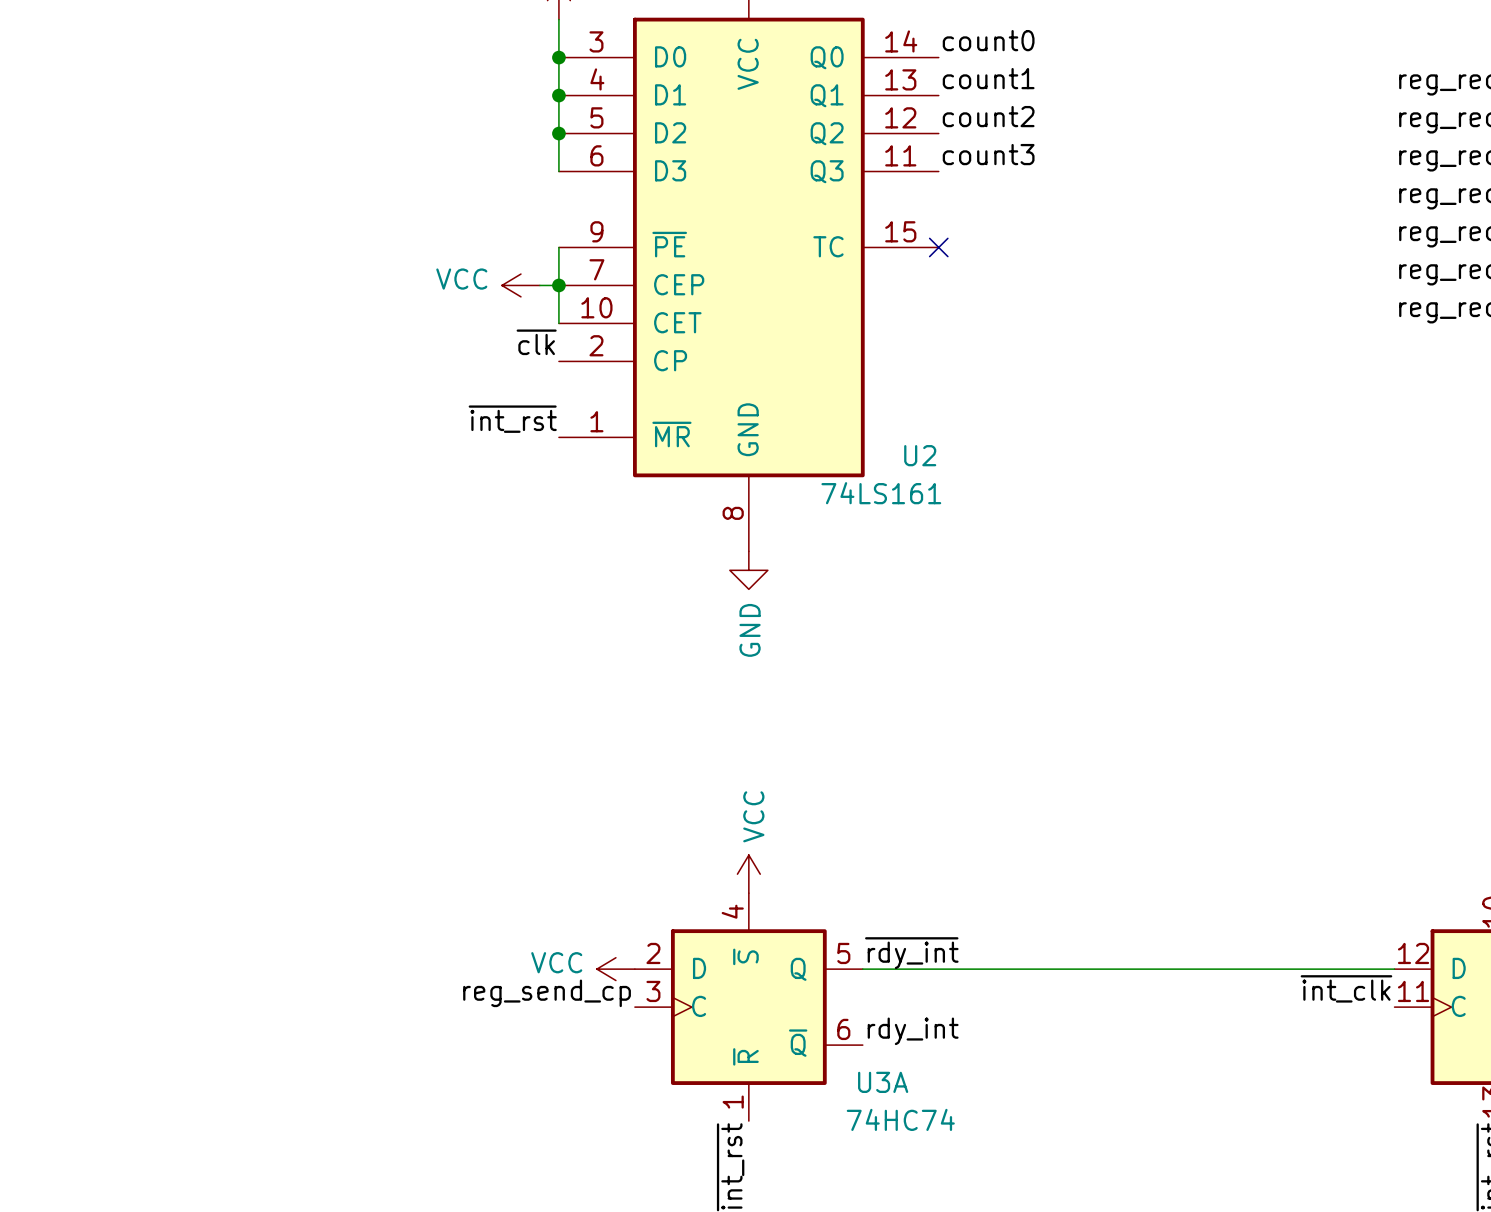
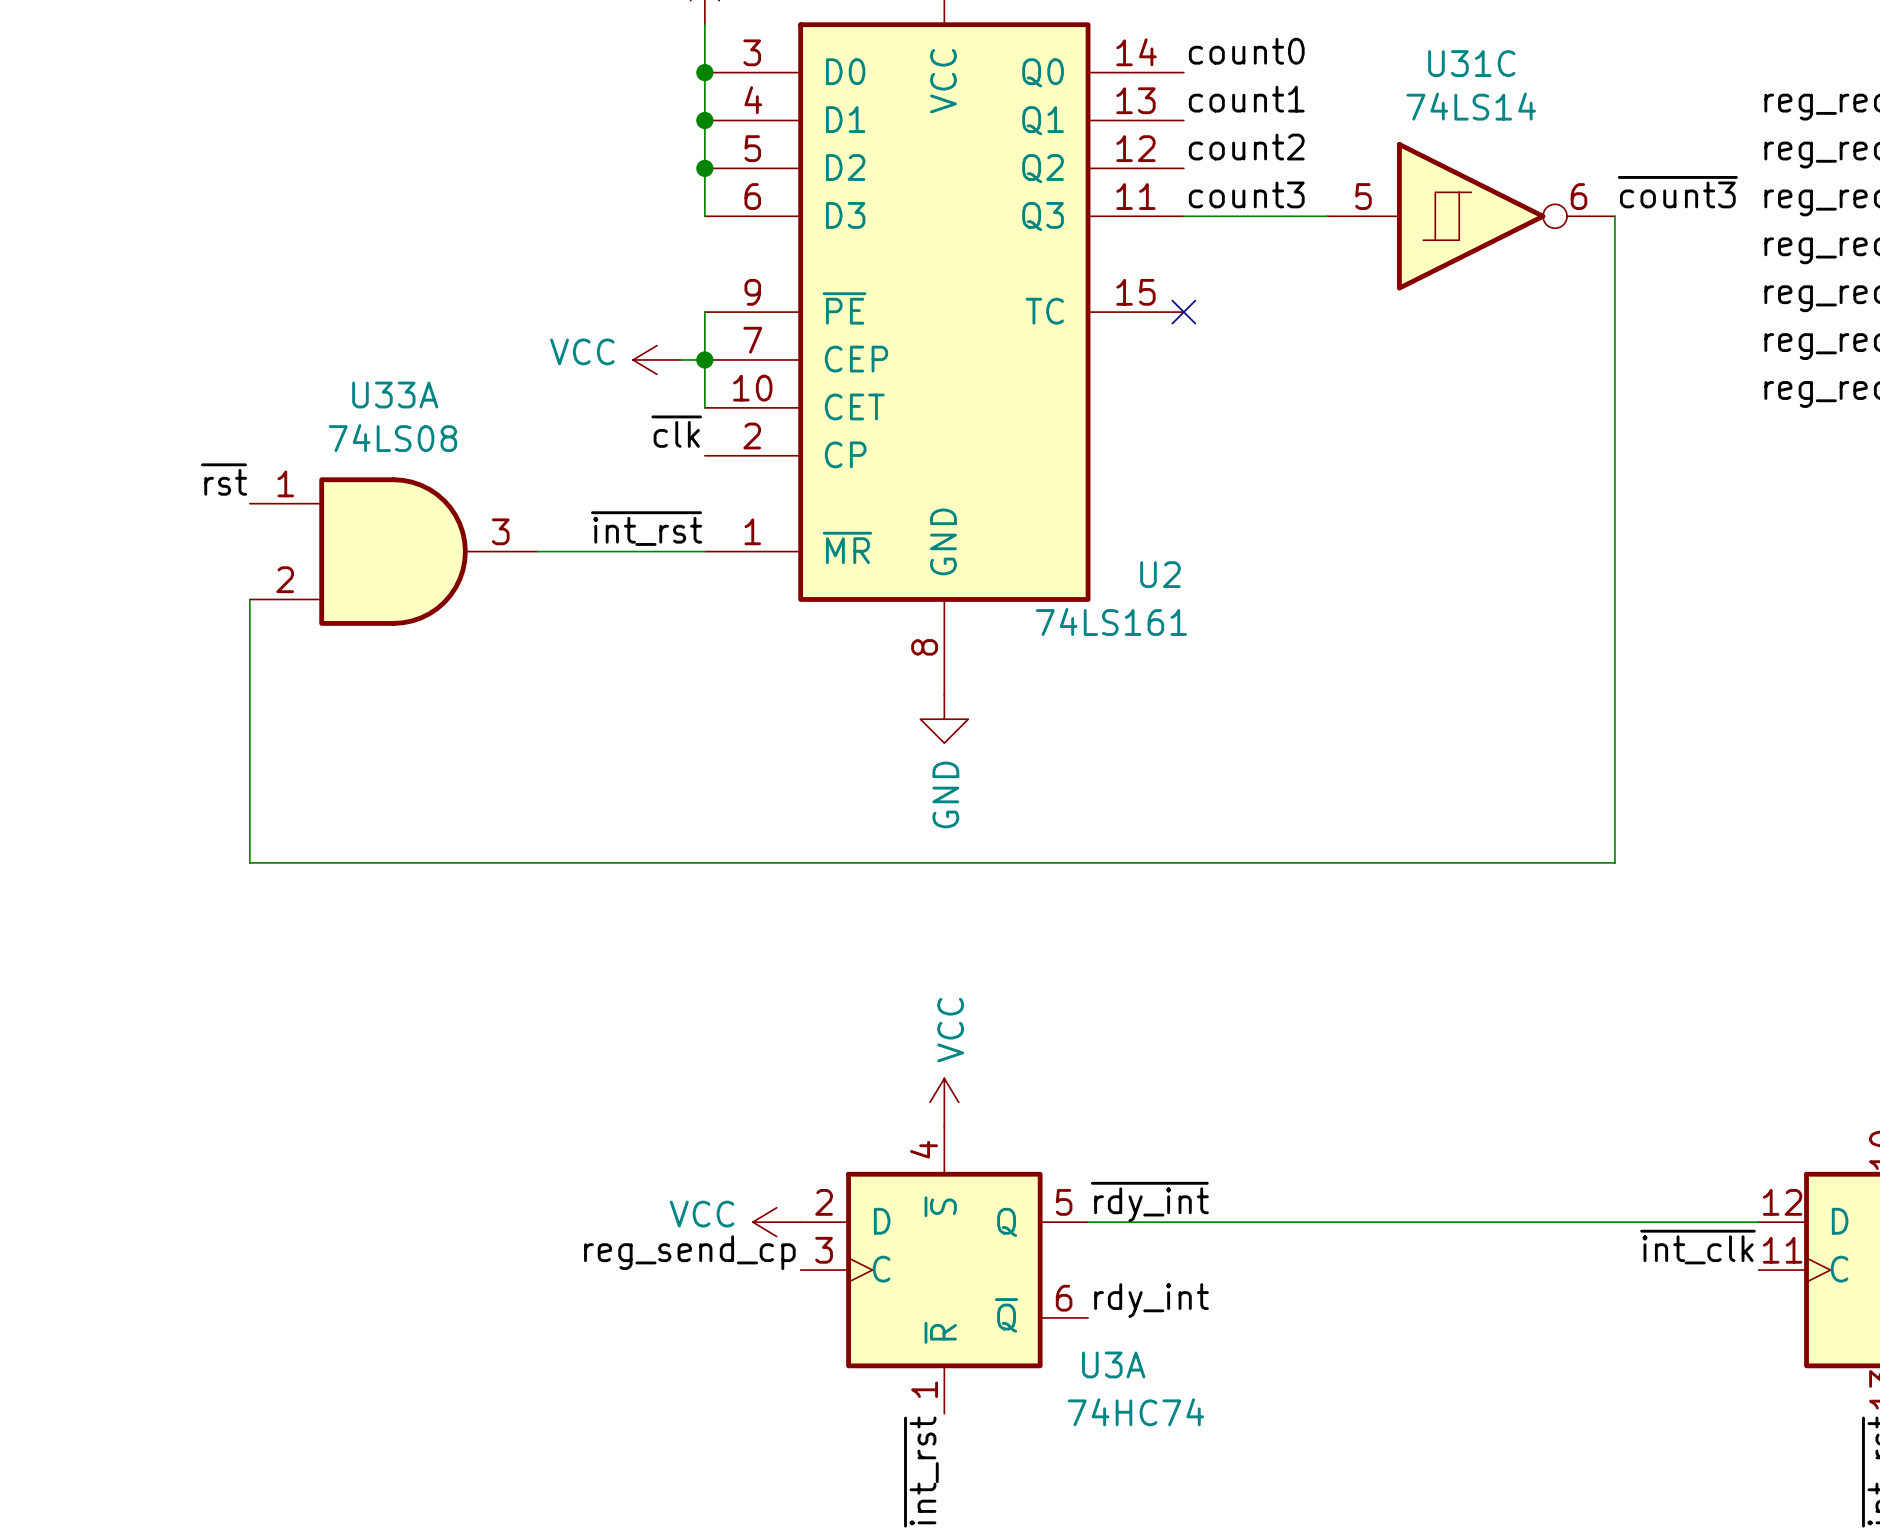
label: none -> ~{count3} (1677, 192)
wire: none -> (1183, 216) (1327, 216)
U31C: none -> 74LS14 (1471, 216)
wire: none -> (1614, 216) (1614, 862) (249, 862) (249, 599)
label: none -> ~{rst} (224, 479)
U33A: none -> 74LS08 (393, 551)
wire: none -> (537, 551) (704, 551)

